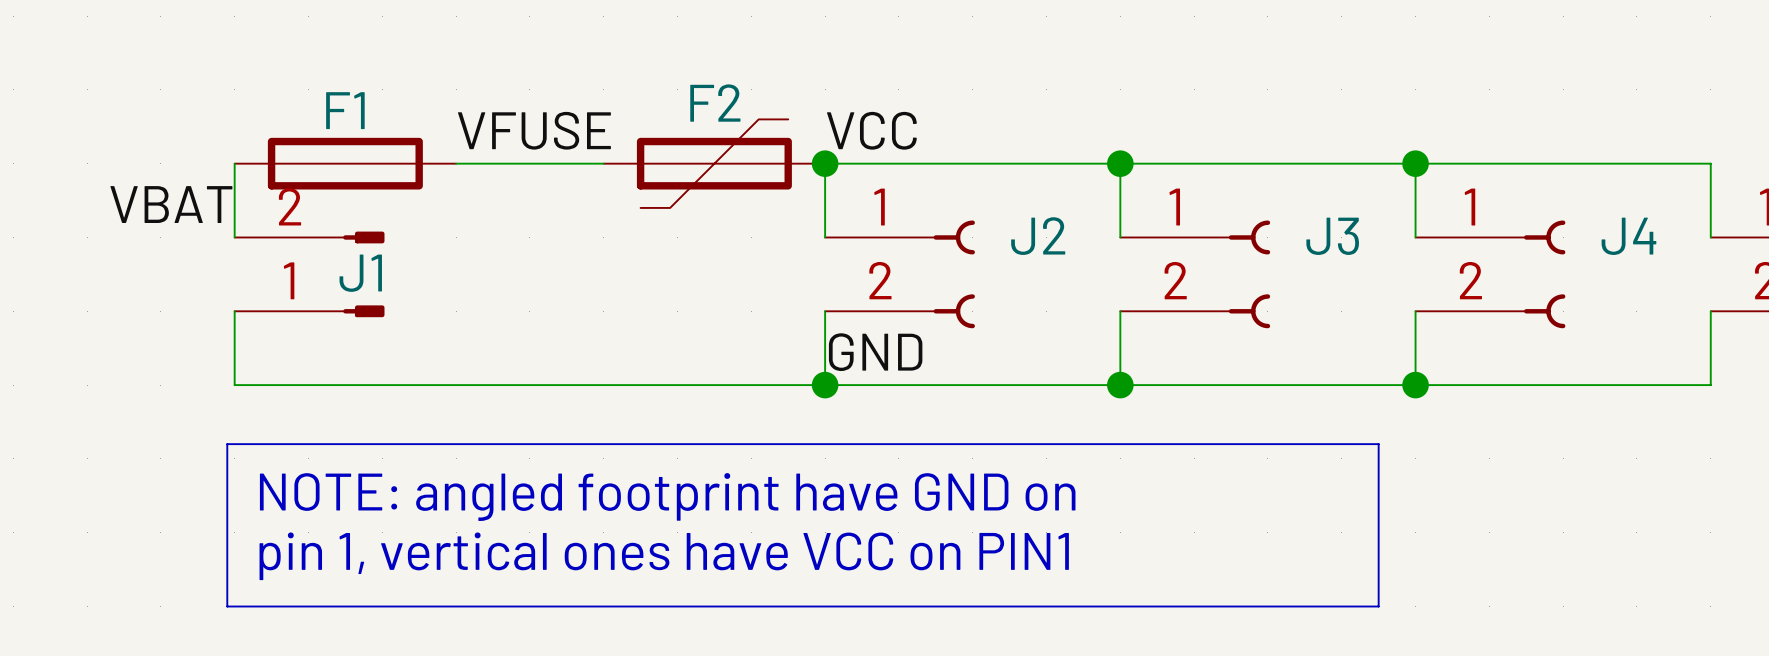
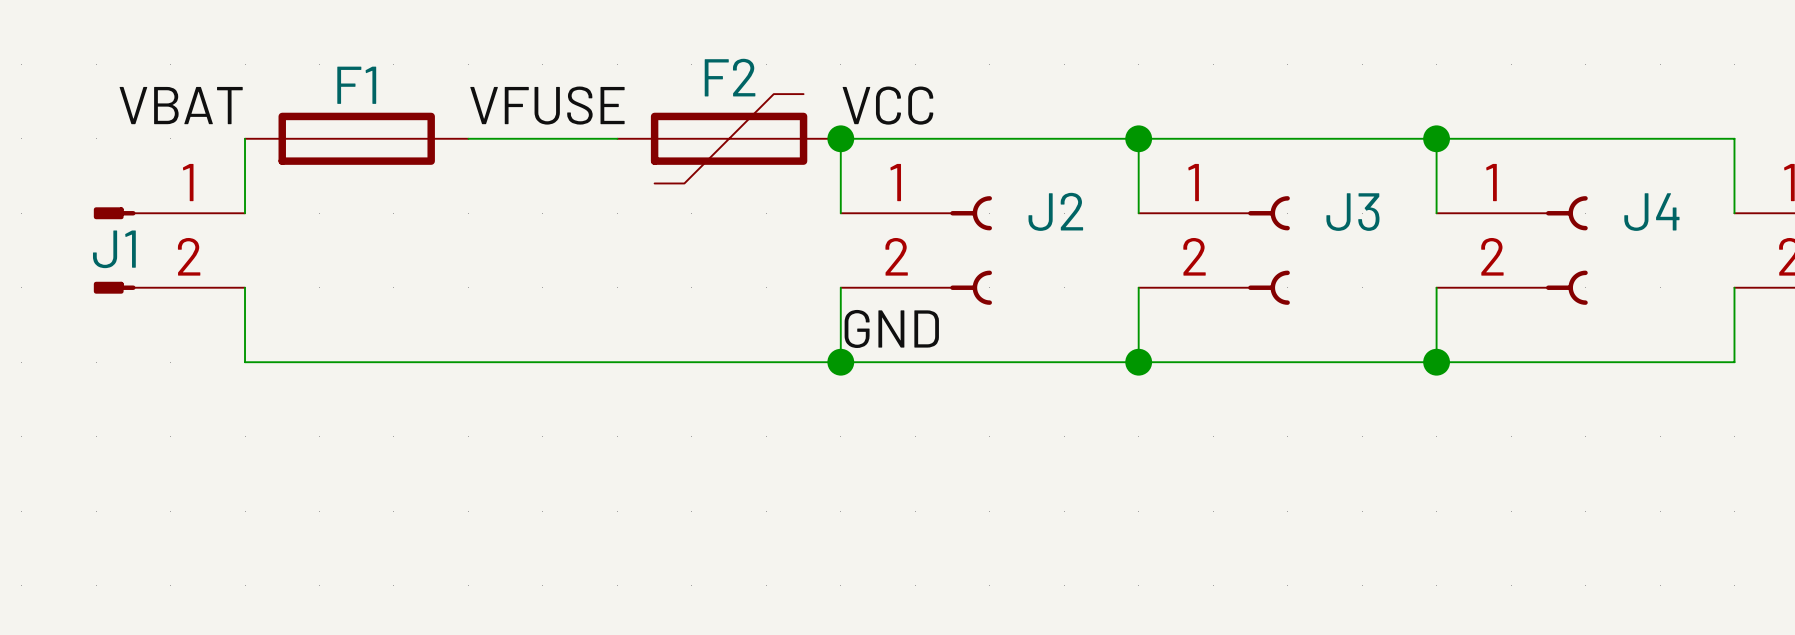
label position: VBAT (171, 204) -> VBAT (181, 105)
J1 position: (309, 274) -> (169, 250)
J1 rotation: 0° (363, 274) -> 180° (114, 250)
line: (227, 444) (1378, 444) (1378, 606) (227, 606) (227, 444) -> none
text: NOTE: angled footprint have GND on (667, 497) -> none
text: pin 1, vertical ones have VCC on PIN1 (664, 556) -> none

